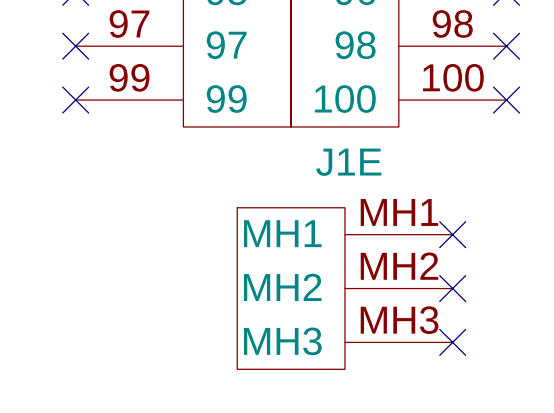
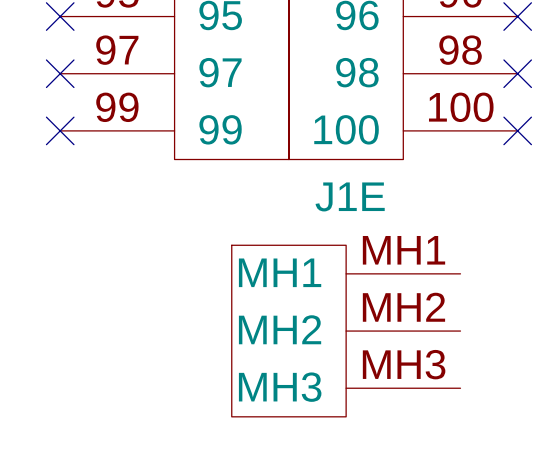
no-connect mark: (452, 234) -> none
no-connect mark: (452, 288) -> none
no-connect mark: (452, 342) -> none

